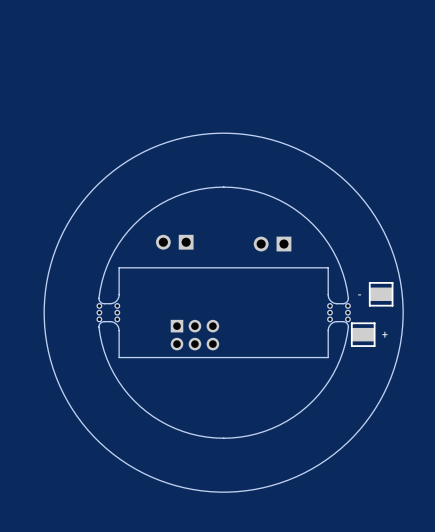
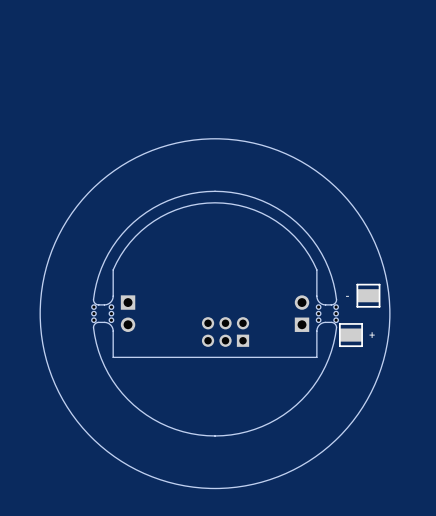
part: (174, 242) -> none
part: (272, 244) -> none
board edge: (328, 267) (119, 267) -> (316, 269) (300, 242) (276, 221) (246, 207) (215, 202) (183, 207) (154, 221) (130, 242) (113, 269)
part: none -> (128, 313)
part: none -> (302, 313)
part rotation: 0° (194, 335) -> 180° (225, 332)
part position: (194, 335) -> (225, 332)

